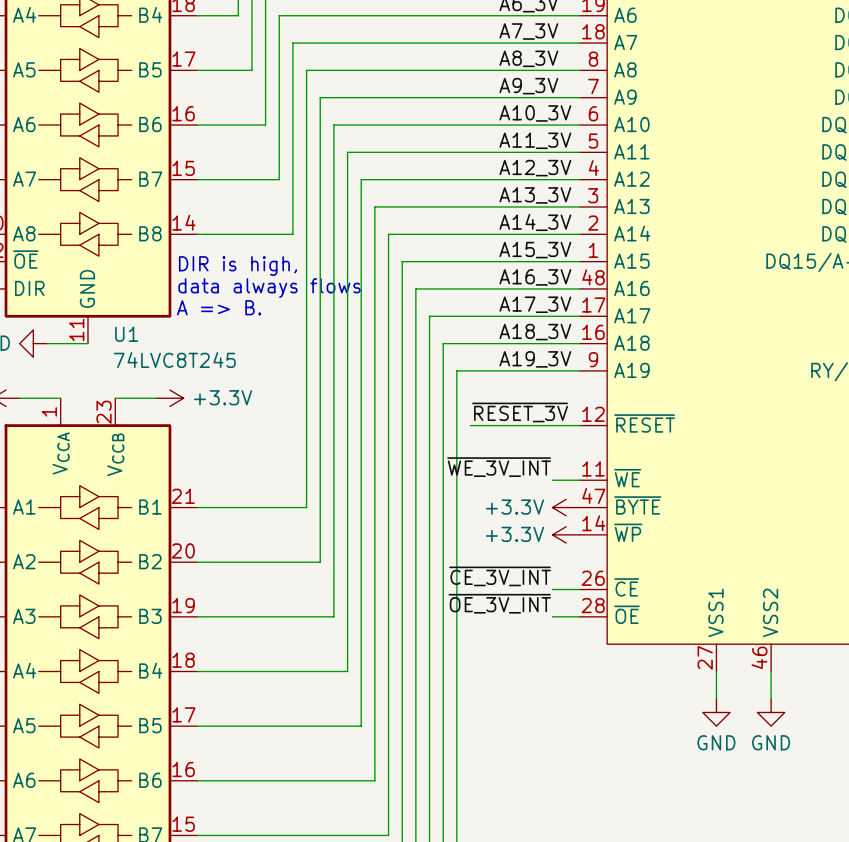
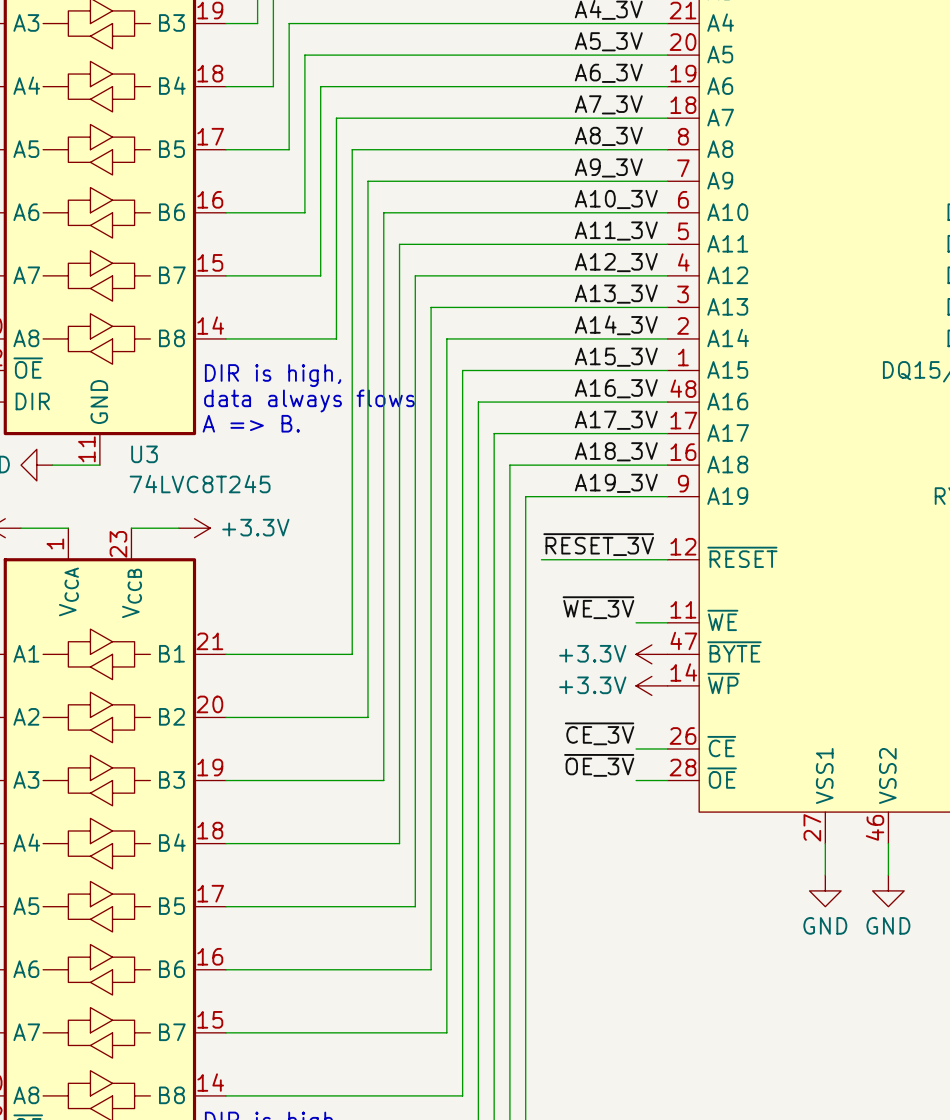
U1 name: U1 (126, 334) -> U3 (144, 454)
label: ~{WE_3V_INT} (499, 467) -> ~{WE_3V} (598, 607)
label: ~{CE_3V_INT} (500, 576) -> ~{CE_3V} (599, 733)
label: ~{OE_3V_INT} (499, 603) -> ~{OE_3V} (599, 765)

